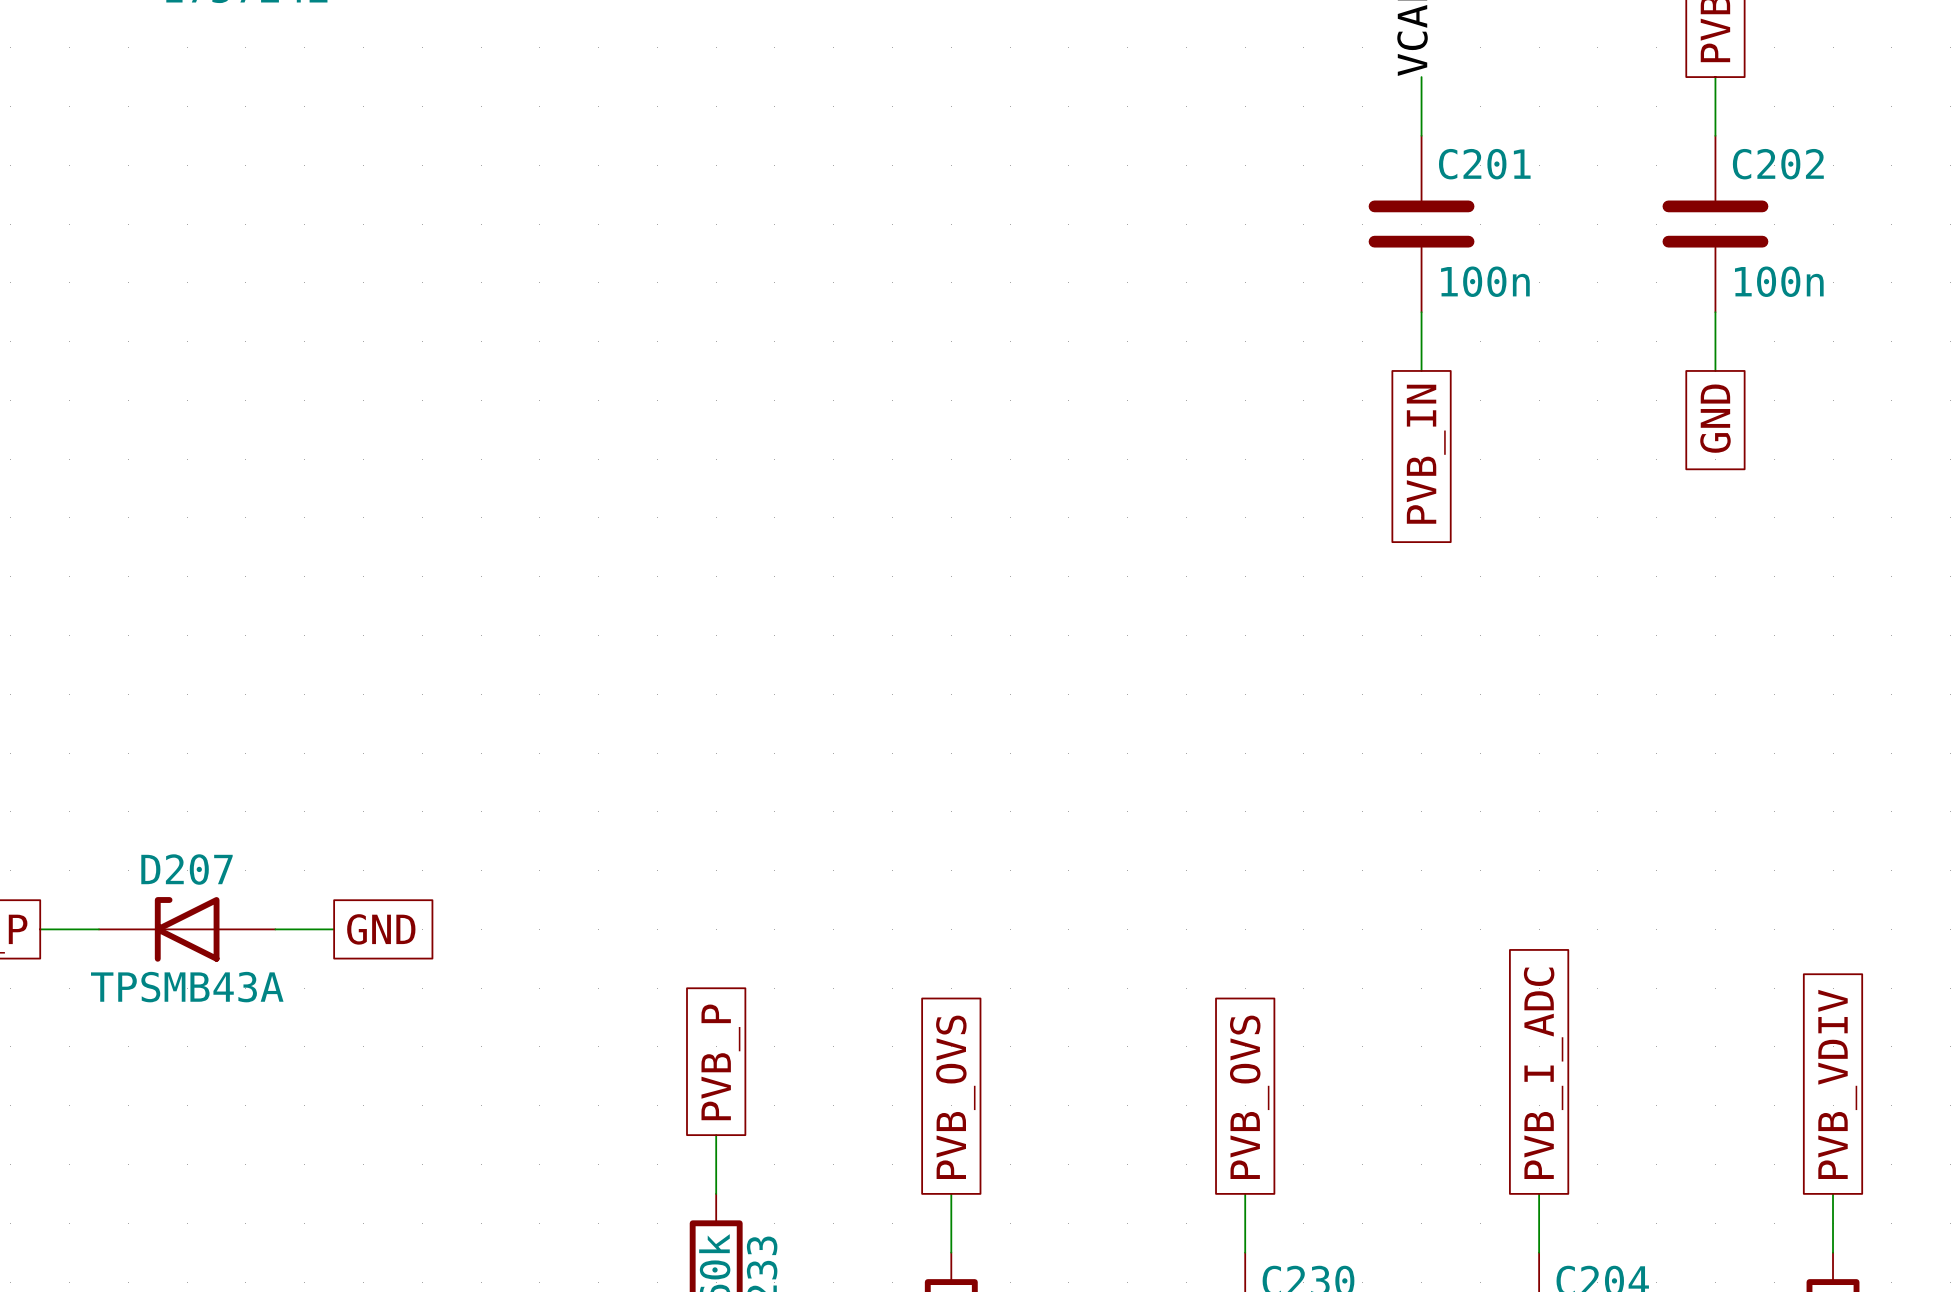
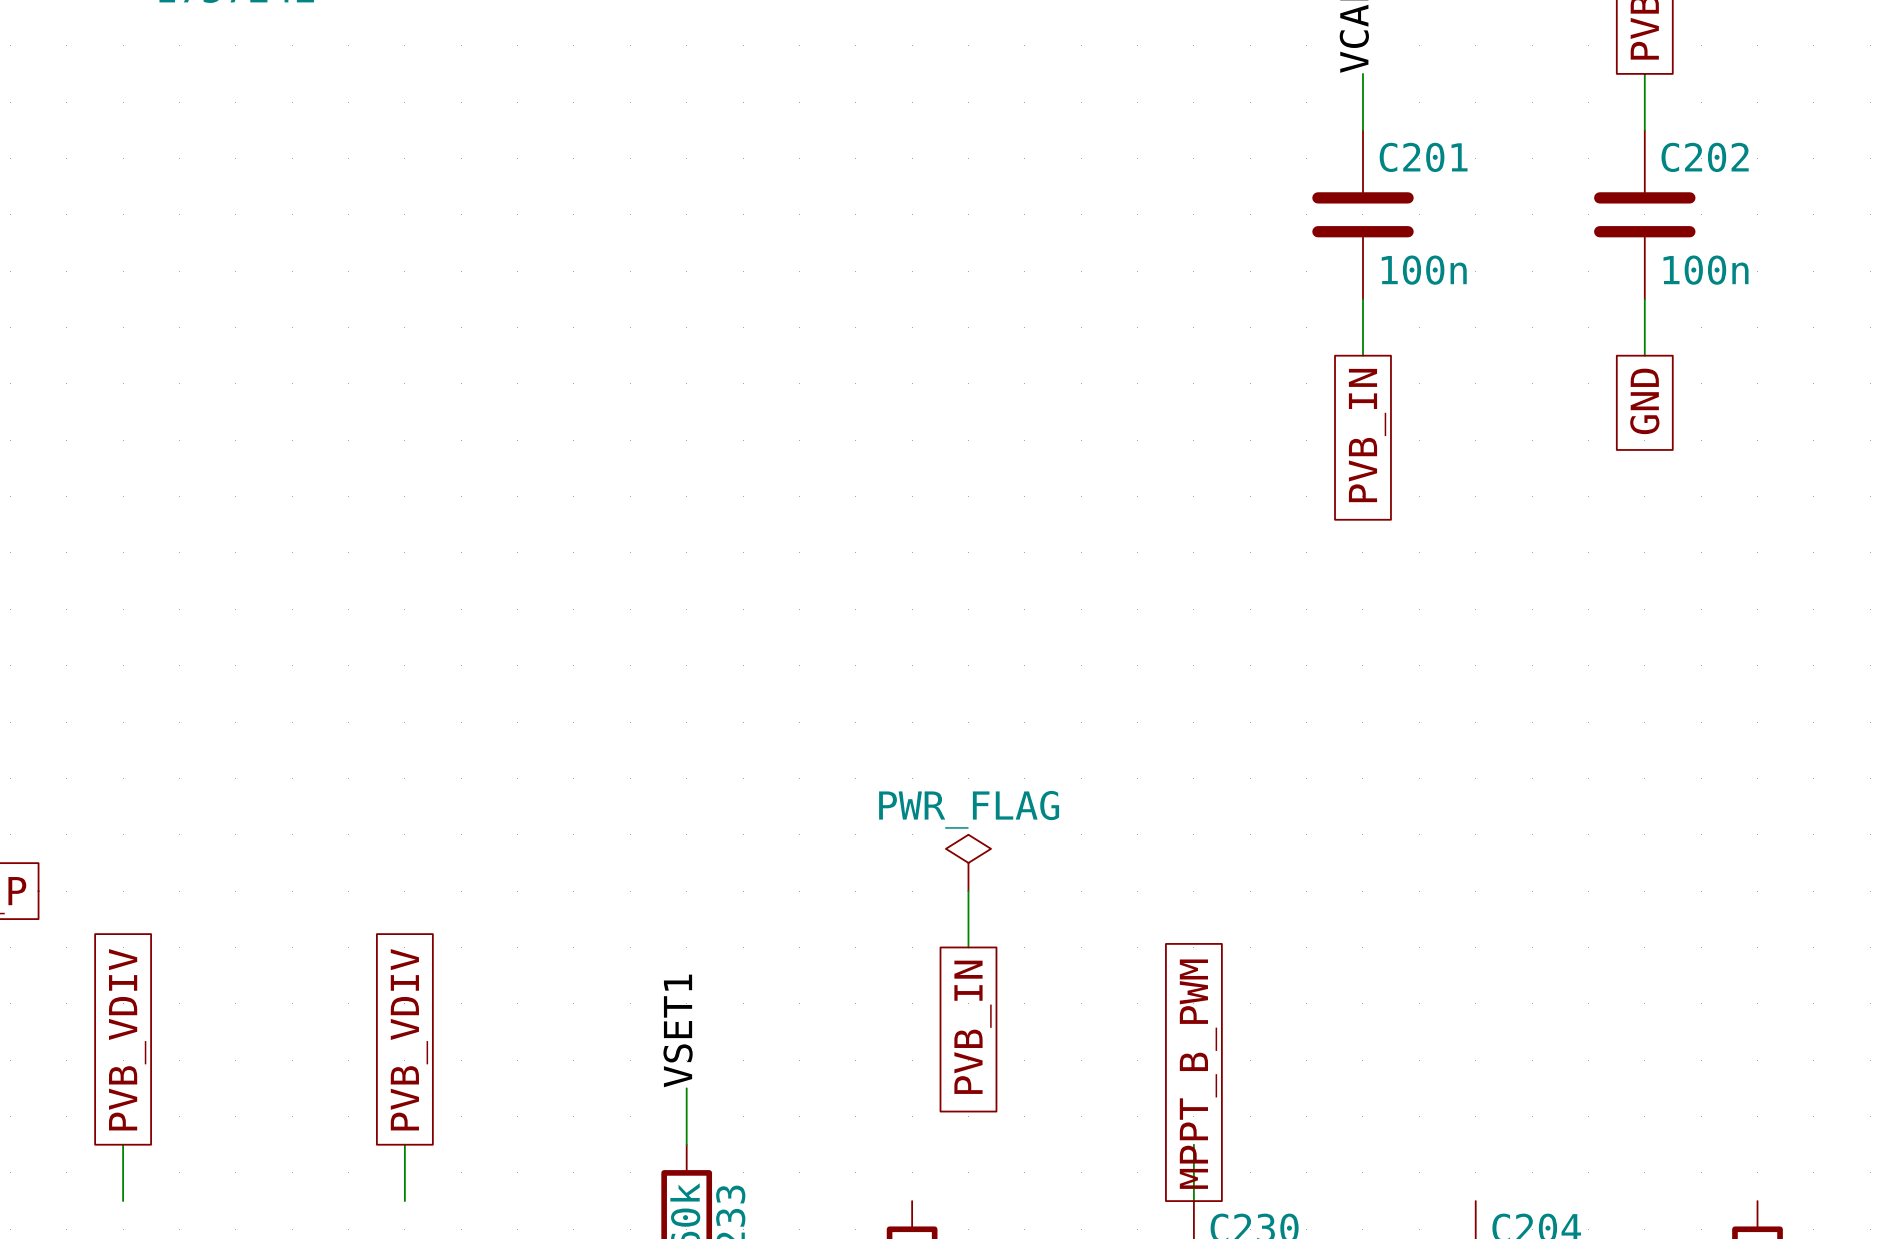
power symbol: none -> PWR_FLAG (968, 862)
wire: (40, 929) (98, 929) -> none
D207: TPSMB43A (187, 929) -> none
wire: (275, 929) (334, 929) -> none
global label: GND (381, 929) -> none
wire: none -> (968, 891) (968, 947)
global label: PVB_P (720, 1062) -> none
global label: PVB_I_ADC (1543, 1073) -> none
label: none -> VSET1 (678, 1030)
global label: none -> PVB_VDIV (127, 1039)
global label: none -> PVB_VDIV (409, 1039)
global label: PVB_VDIV (1837, 1084) -> none
global label: PVB_OVS (955, 1097) -> PVB_IN (973, 1027)
global label: PVB_OVS (1249, 1097) -> none
global label: none -> MPPT_B_PWM (1198, 1074)
wire: none -> (123, 1144) (123, 1201)
wire: (951, 1193) (951, 1252) -> (404, 1144) (404, 1201)
wire: (1539, 1193) (1539, 1252) -> none
wire: (1833, 1193) (1833, 1252) -> none

